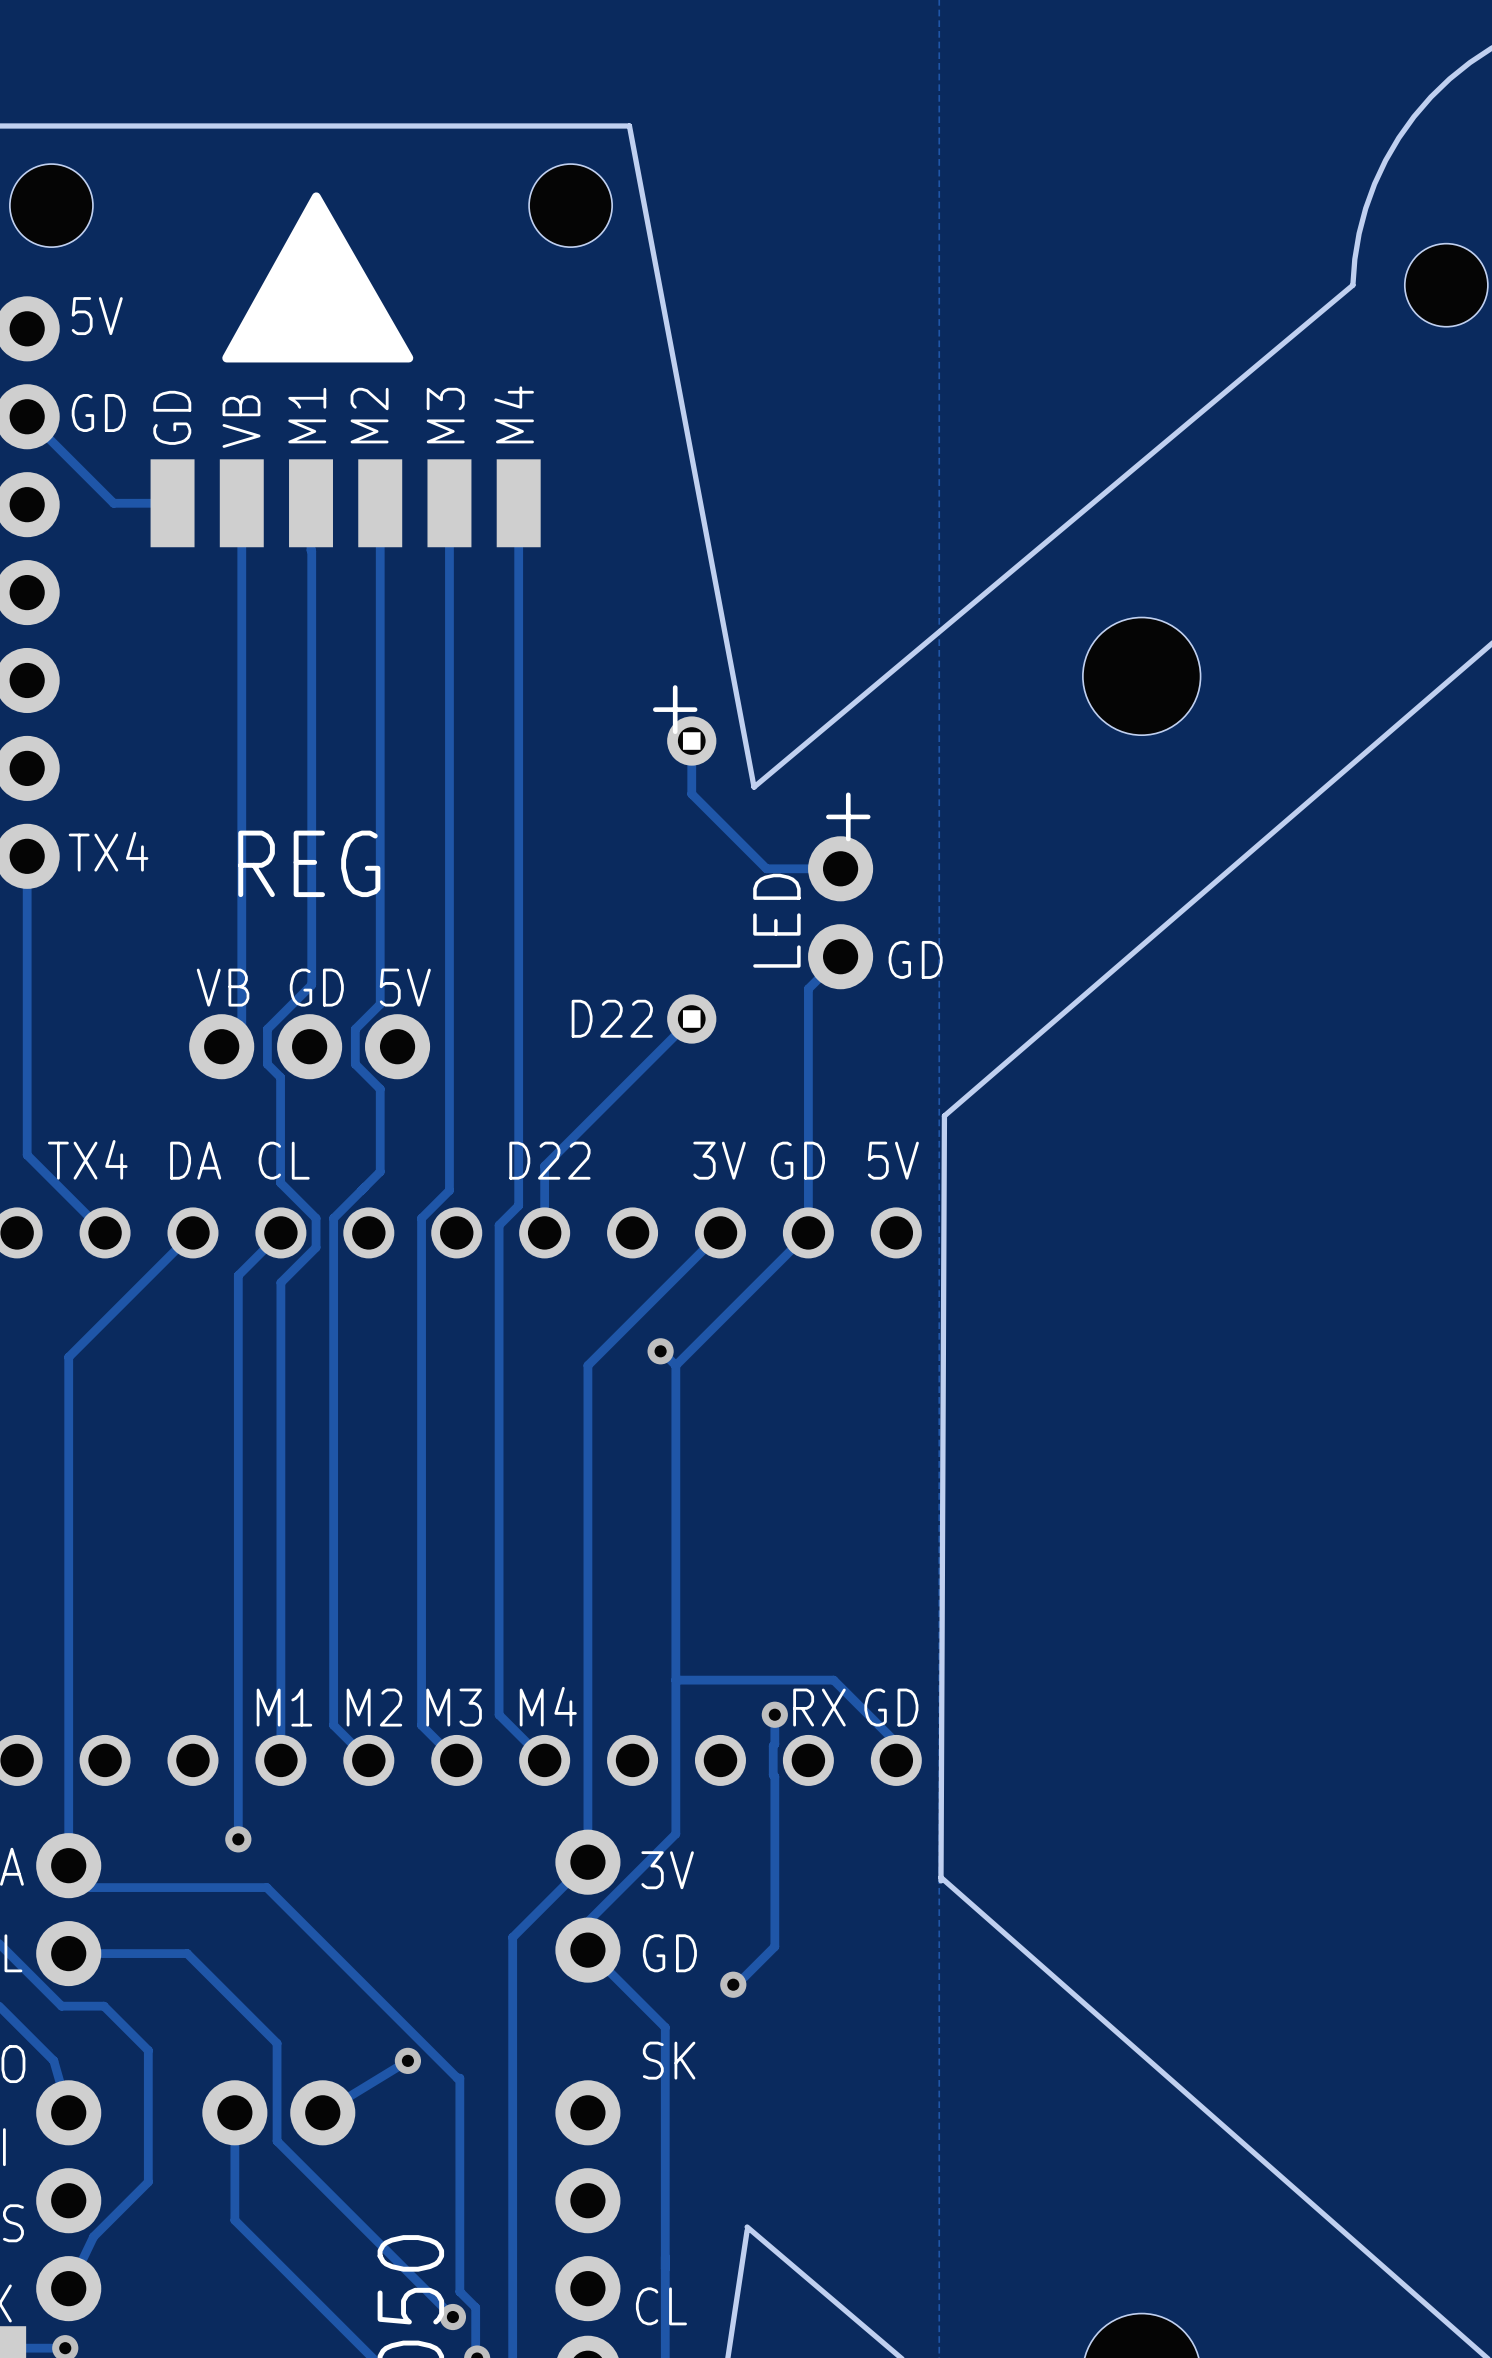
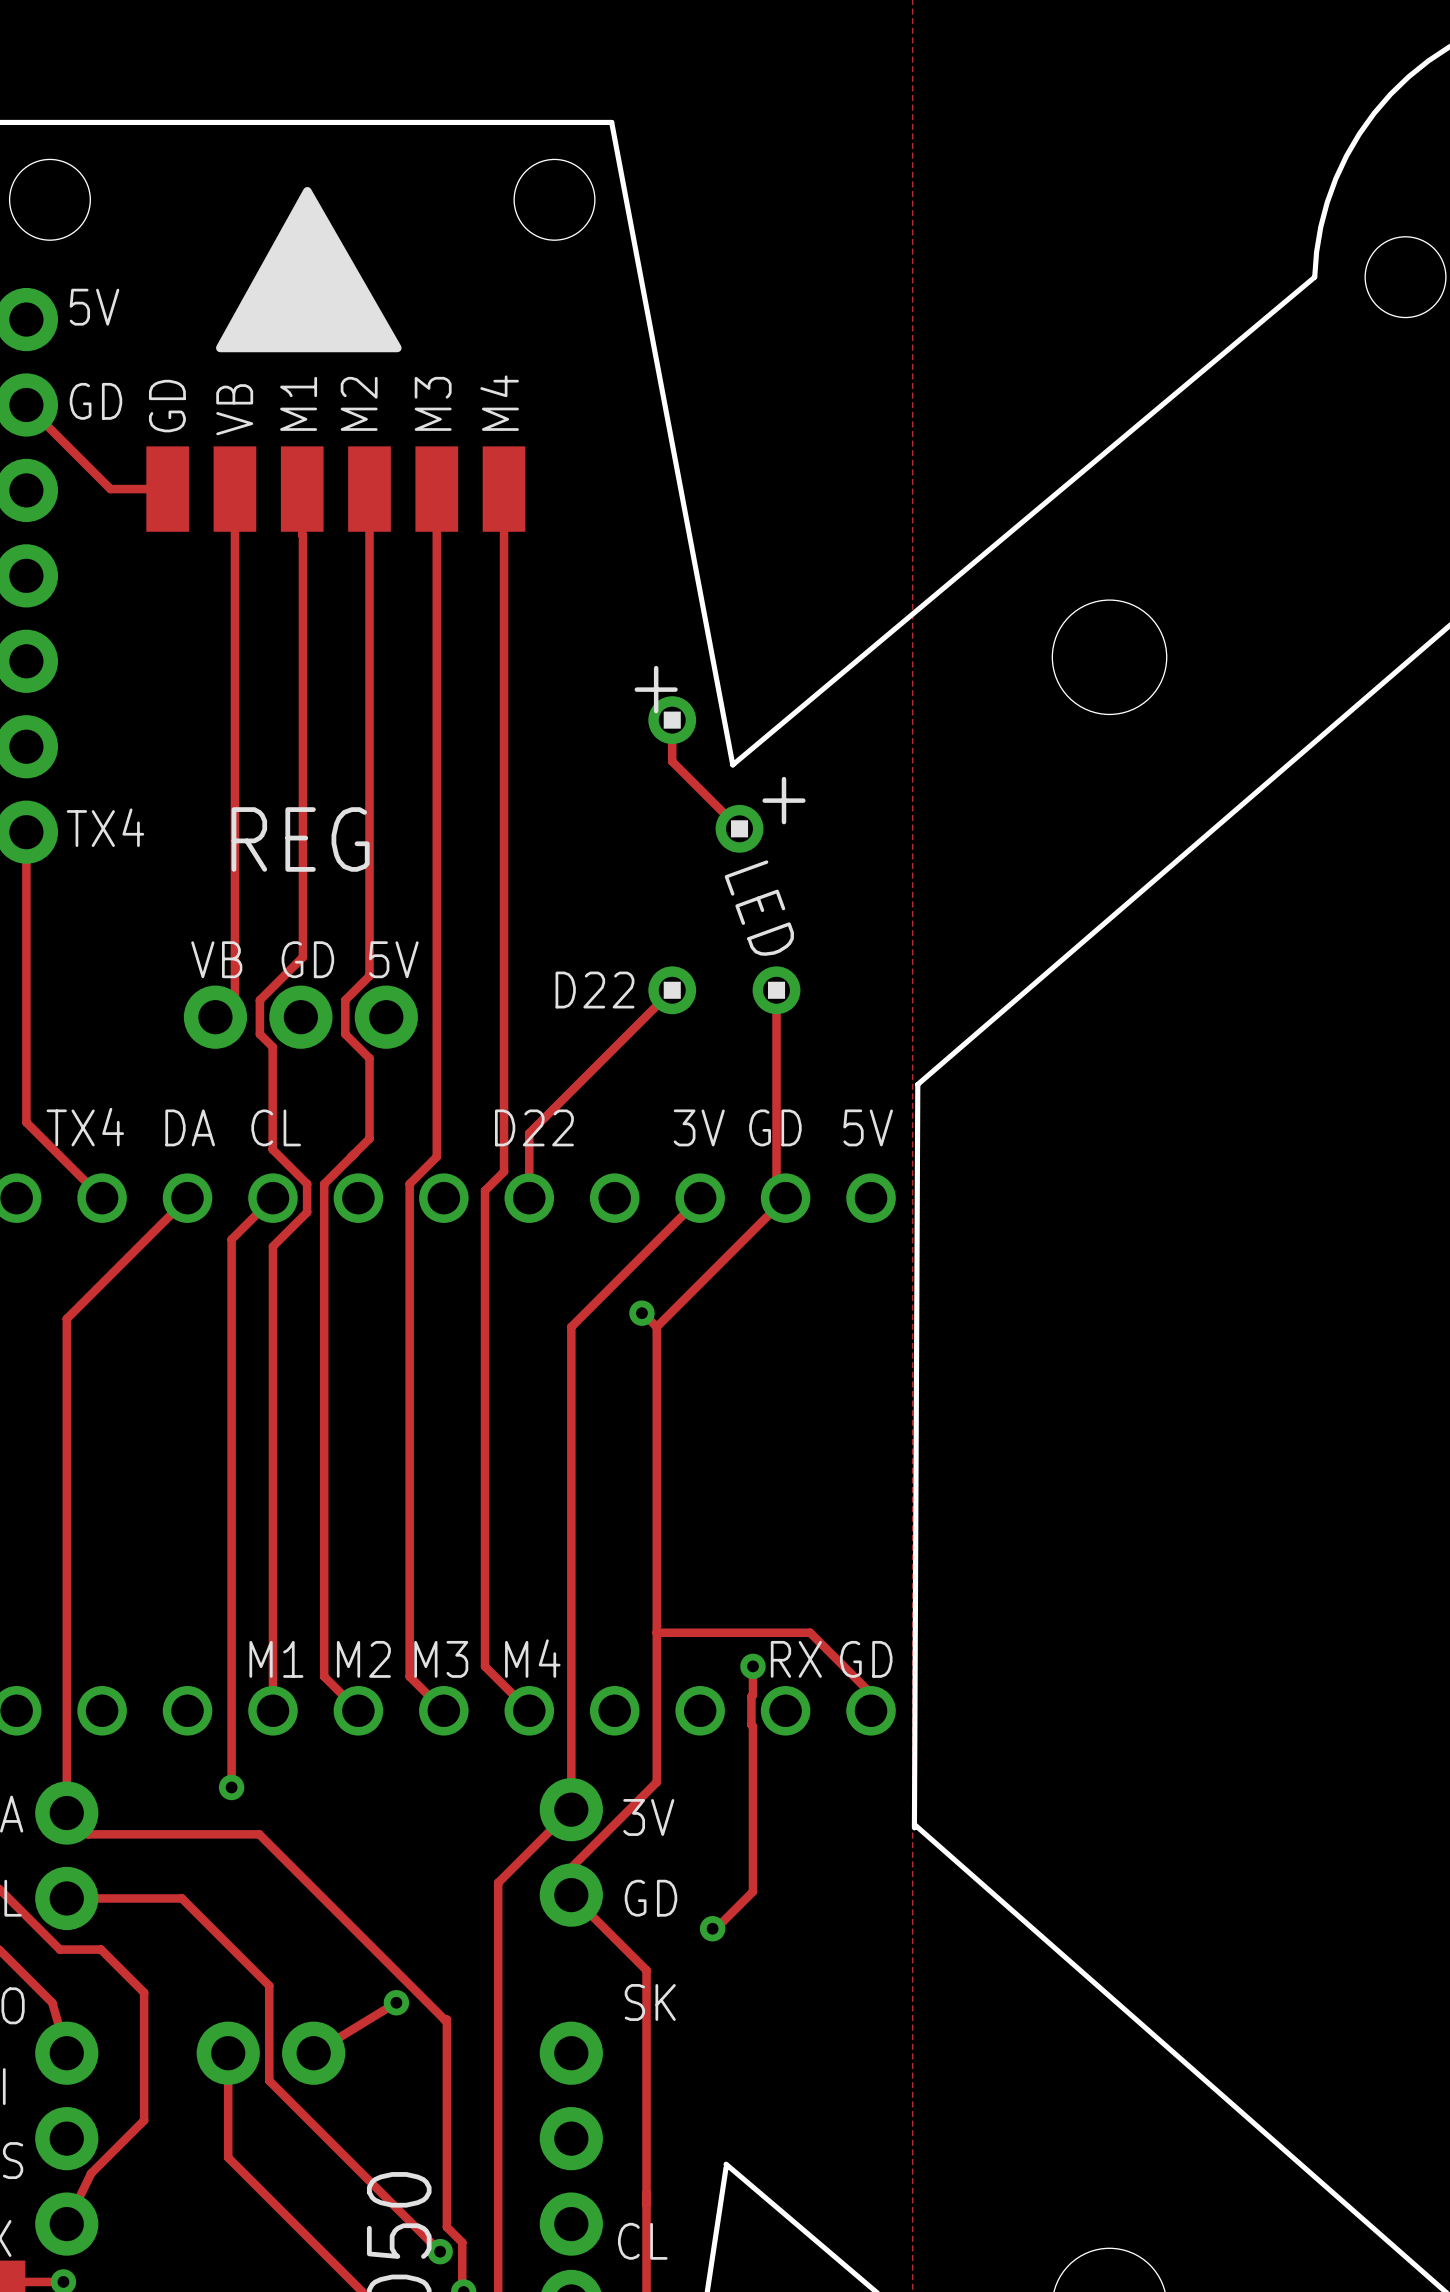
track: (691, 783) (691, 794) (766, 868) (840, 868) -> (672, 761) (739, 828)
text position: + (848, 816) -> + (783, 800)
part: none -> (739, 828)
part: (840, 912) -> none
text rotation: 0° (776, 920) -> 160° clockwise (759, 908)
track: (840, 956) (808, 988) (808, 1232) -> none
text: GD (915, 959) -> none
track: none -> (776, 990) (776, 1189)
part: none -> (776, 990)

